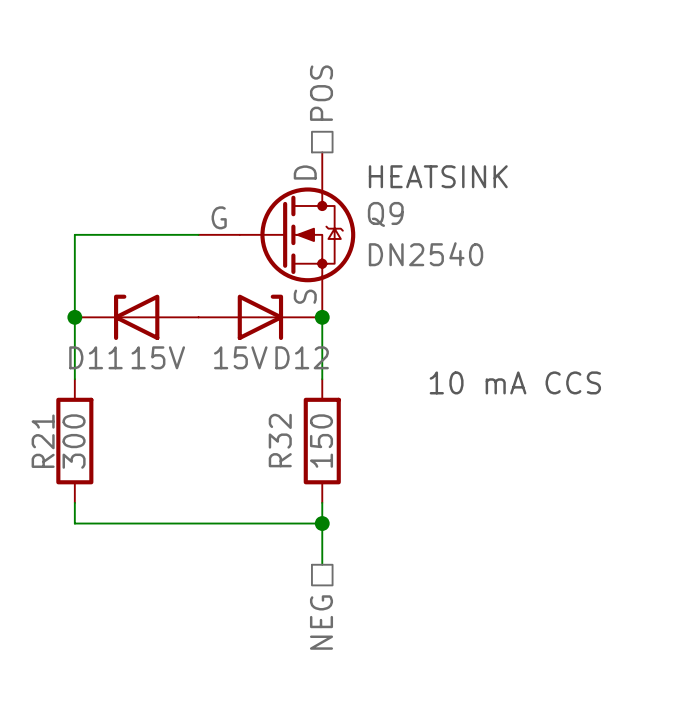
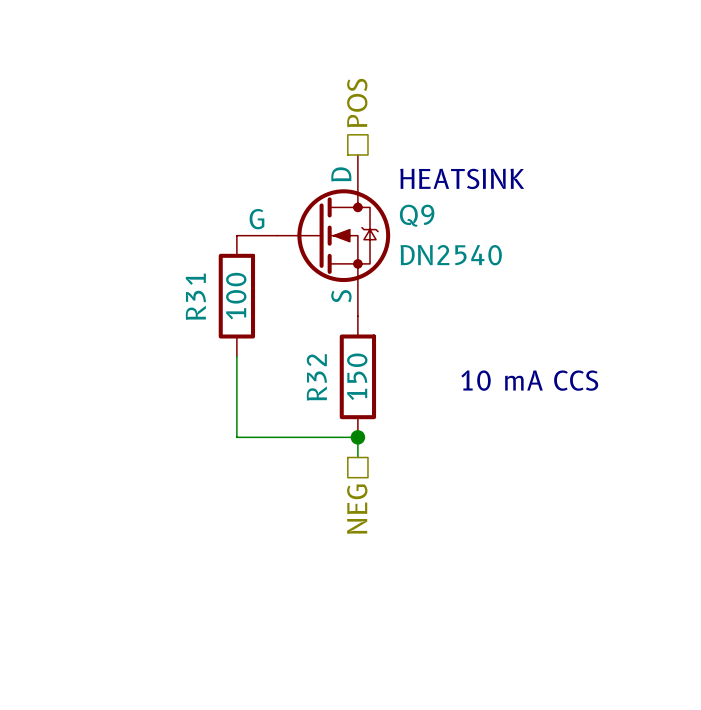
wire: (198, 234) (74, 234) (74, 379) -> none
R31: none -> 100 (236, 296)
junction: (74, 317) -> none
D11: 15V (136, 317) -> none
D12: 15V (260, 317) -> none
junction: (322, 317) -> none
wire: none -> (236, 356) (236, 437) (357, 437) (357, 457)
R21: 300 (74, 441) -> none
junction: none -> (357, 437)
R32 position: (322, 441) -> (357, 376)
wire: (74, 502) (74, 523) (322, 523) -> none
wire: (322, 502) (322, 564) -> none
junction: (322, 523) -> none
hierarchical label position: NEG (321, 622) -> NEG (357, 509)

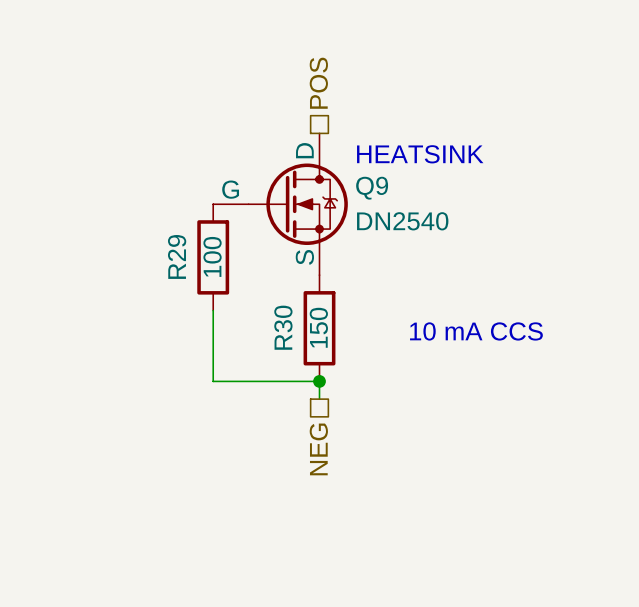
R31 name: R31 (195, 296) -> R29 (177, 256)
R32 name: R32 (316, 377) -> R30 (283, 327)

